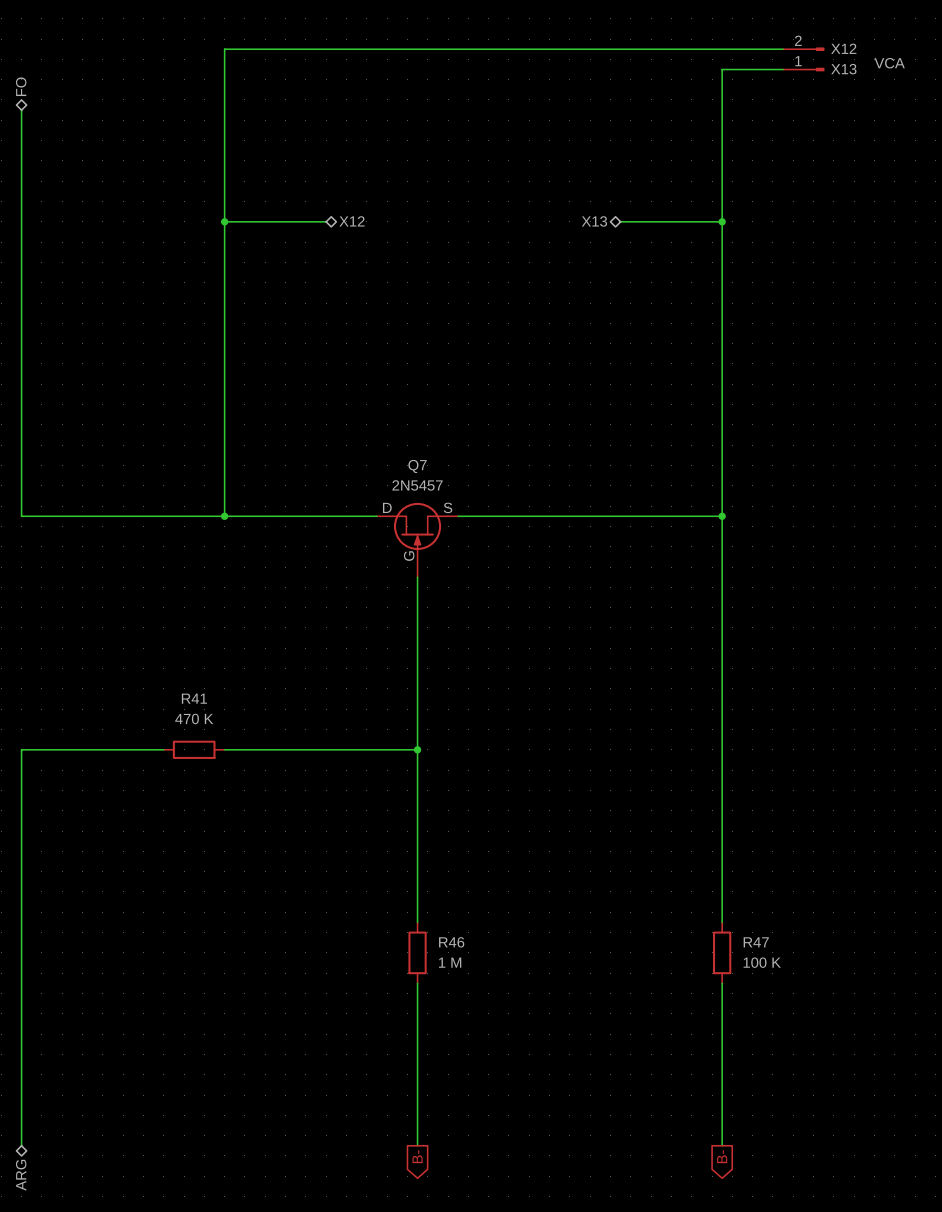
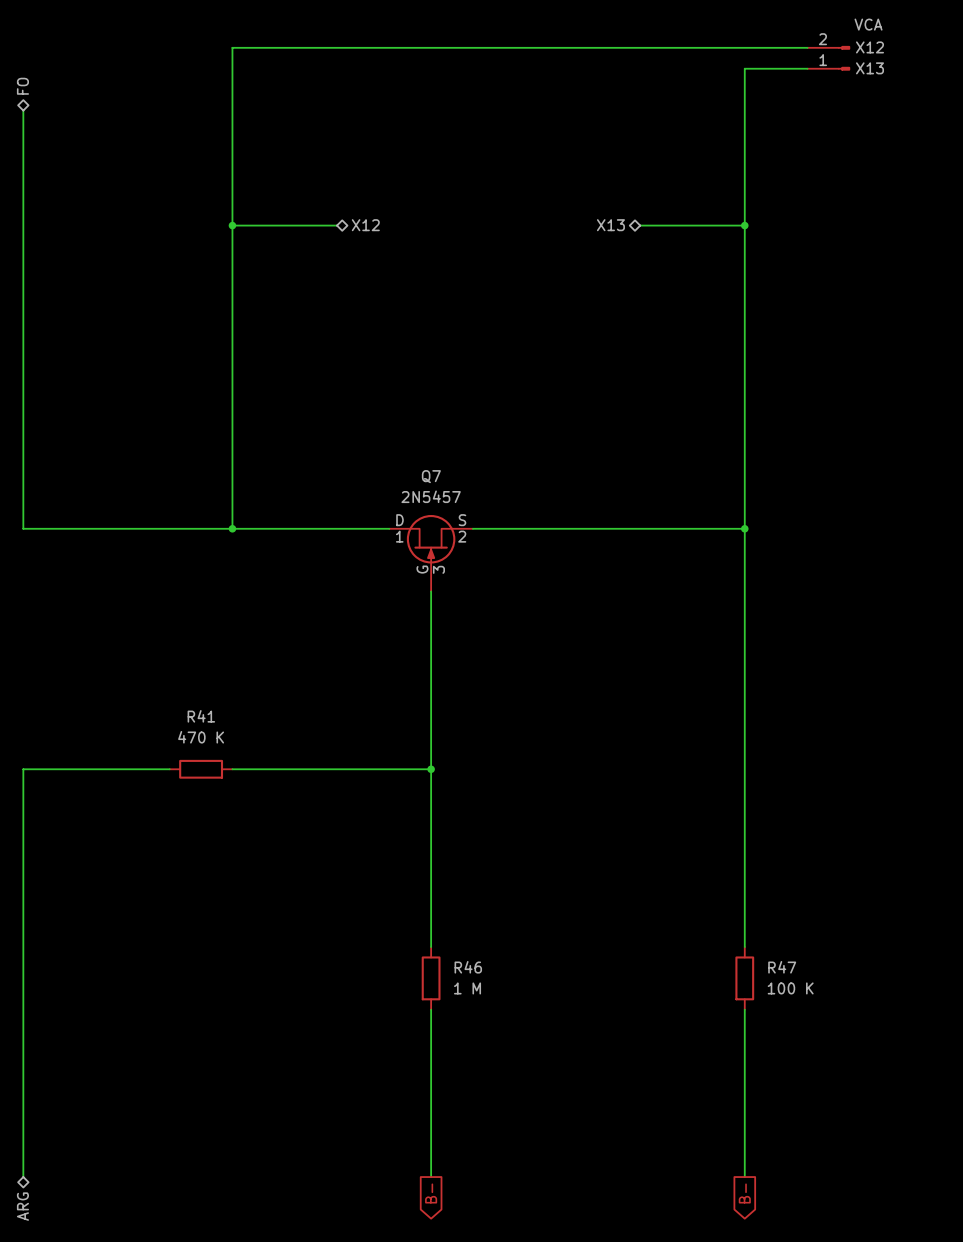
part value position: VCA (889, 63) -> VCA (868, 24)
Q7 pin number: none -> 1 (399, 536)
Q7 pin number: none -> 2 (462, 536)
Q7 pin number: none -> 3 (438, 569)

